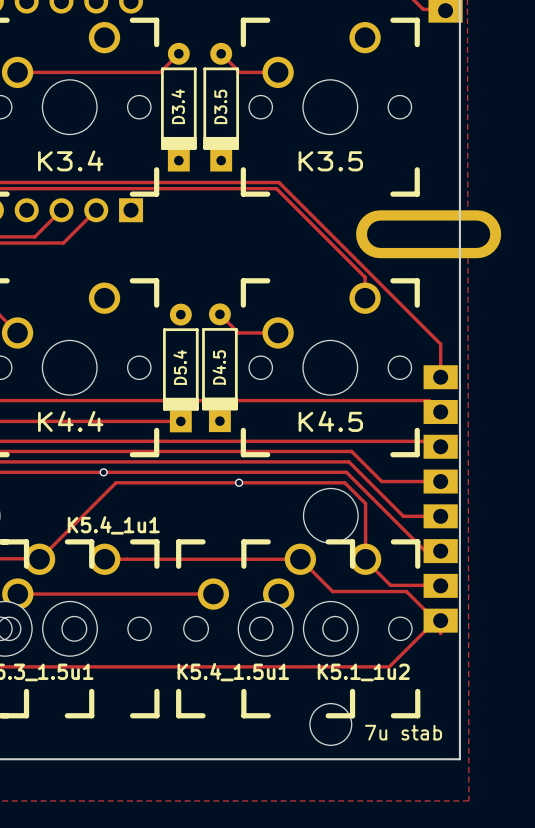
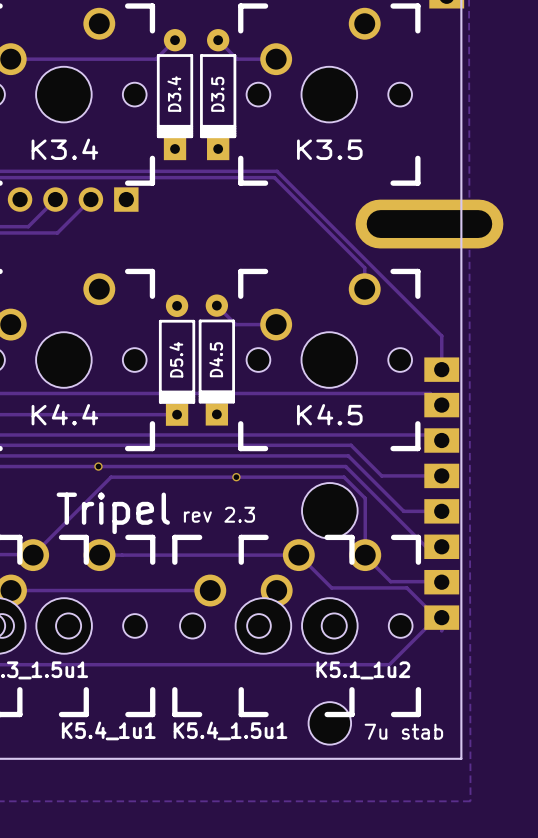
text: none -> Tripel (113, 513)
text: none -> rev 2.3 (219, 514)
K5.4_1u1 name position: K5.4_1u1 (113, 525) -> K5.4_1u1 (108, 730)
K5.4_1.5u1 name position: K5.4_1.5u1 (233, 672) -> K5.4_1.5u1 (230, 730)

